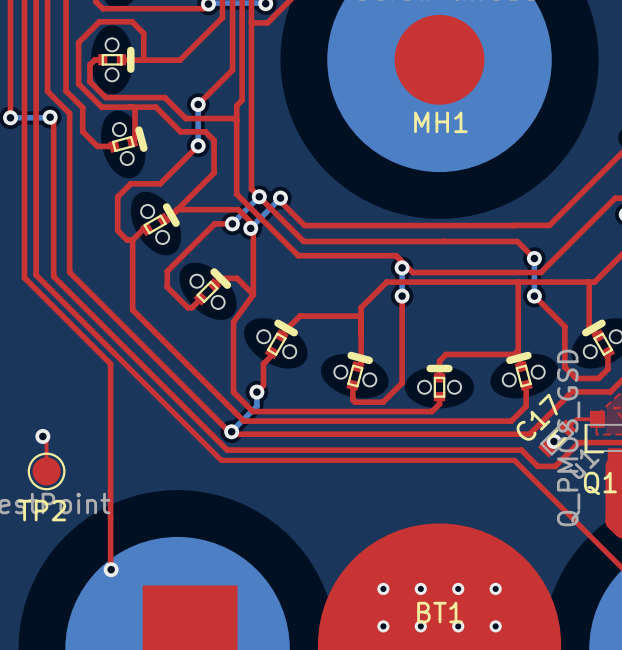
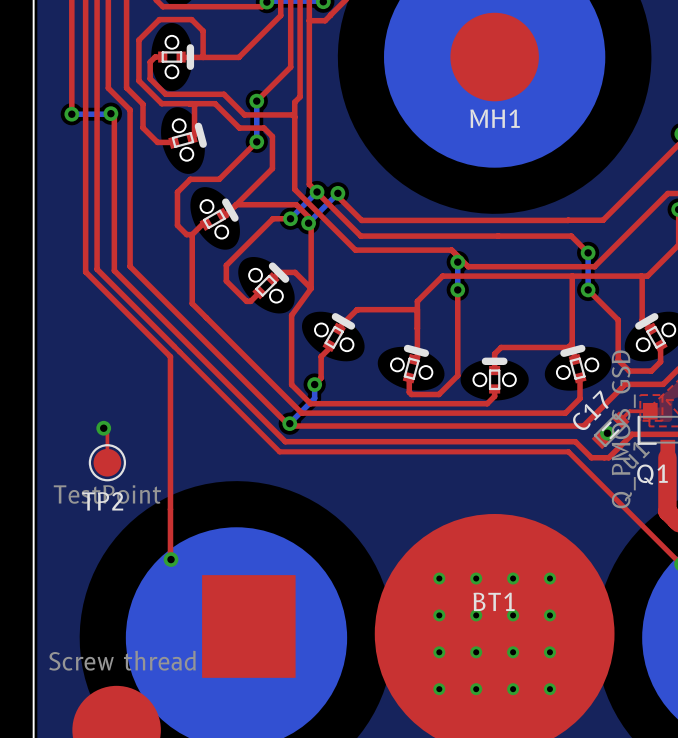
top zone outline: none -> (640, 395) (640, 420) (662, 420) (662, 395) (640, 395)

